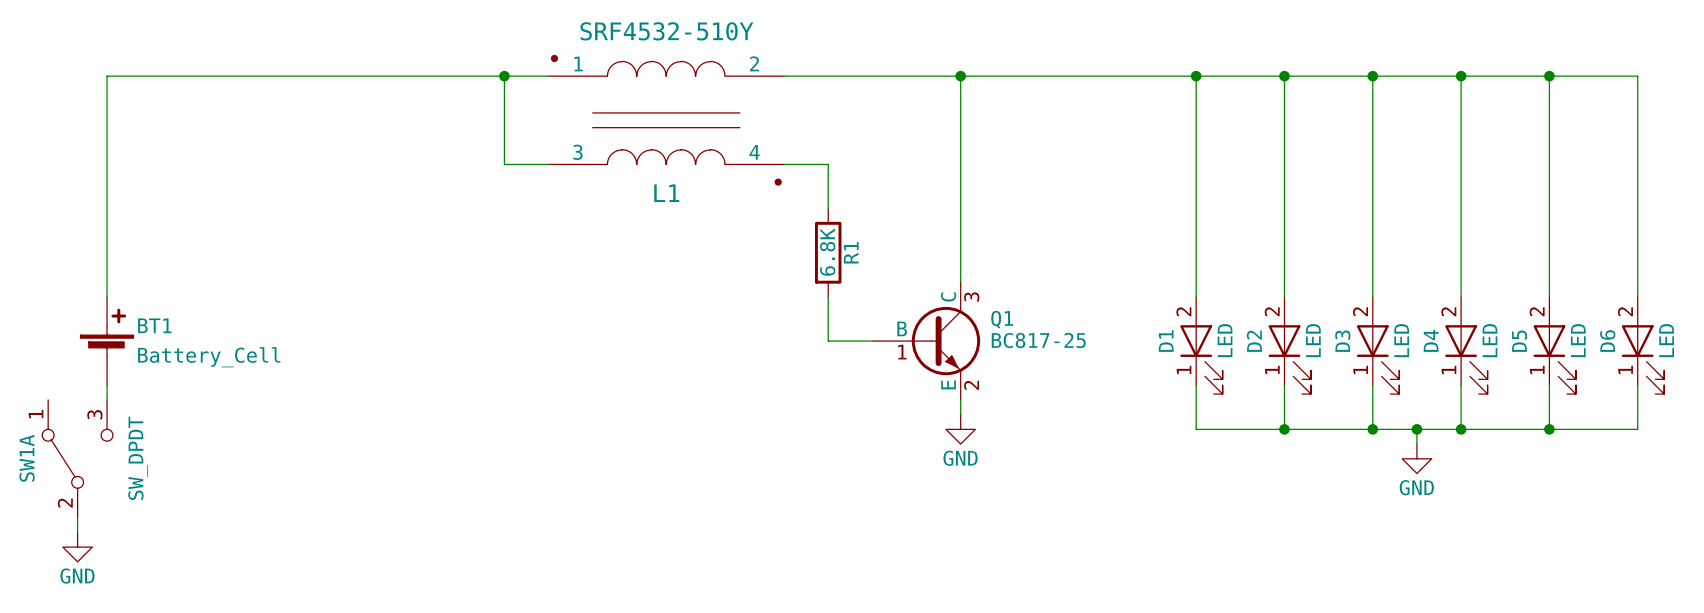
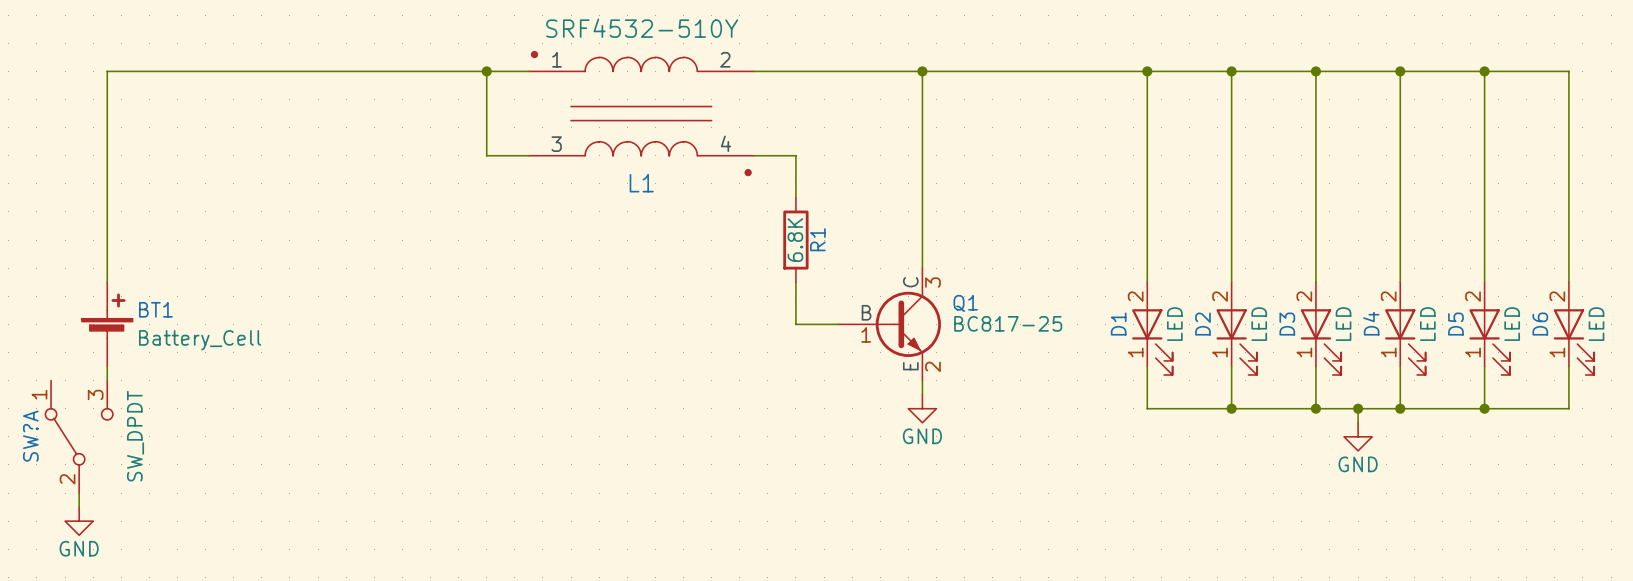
SW1A name: SW1A (27, 458) -> SW?A (30, 436)

